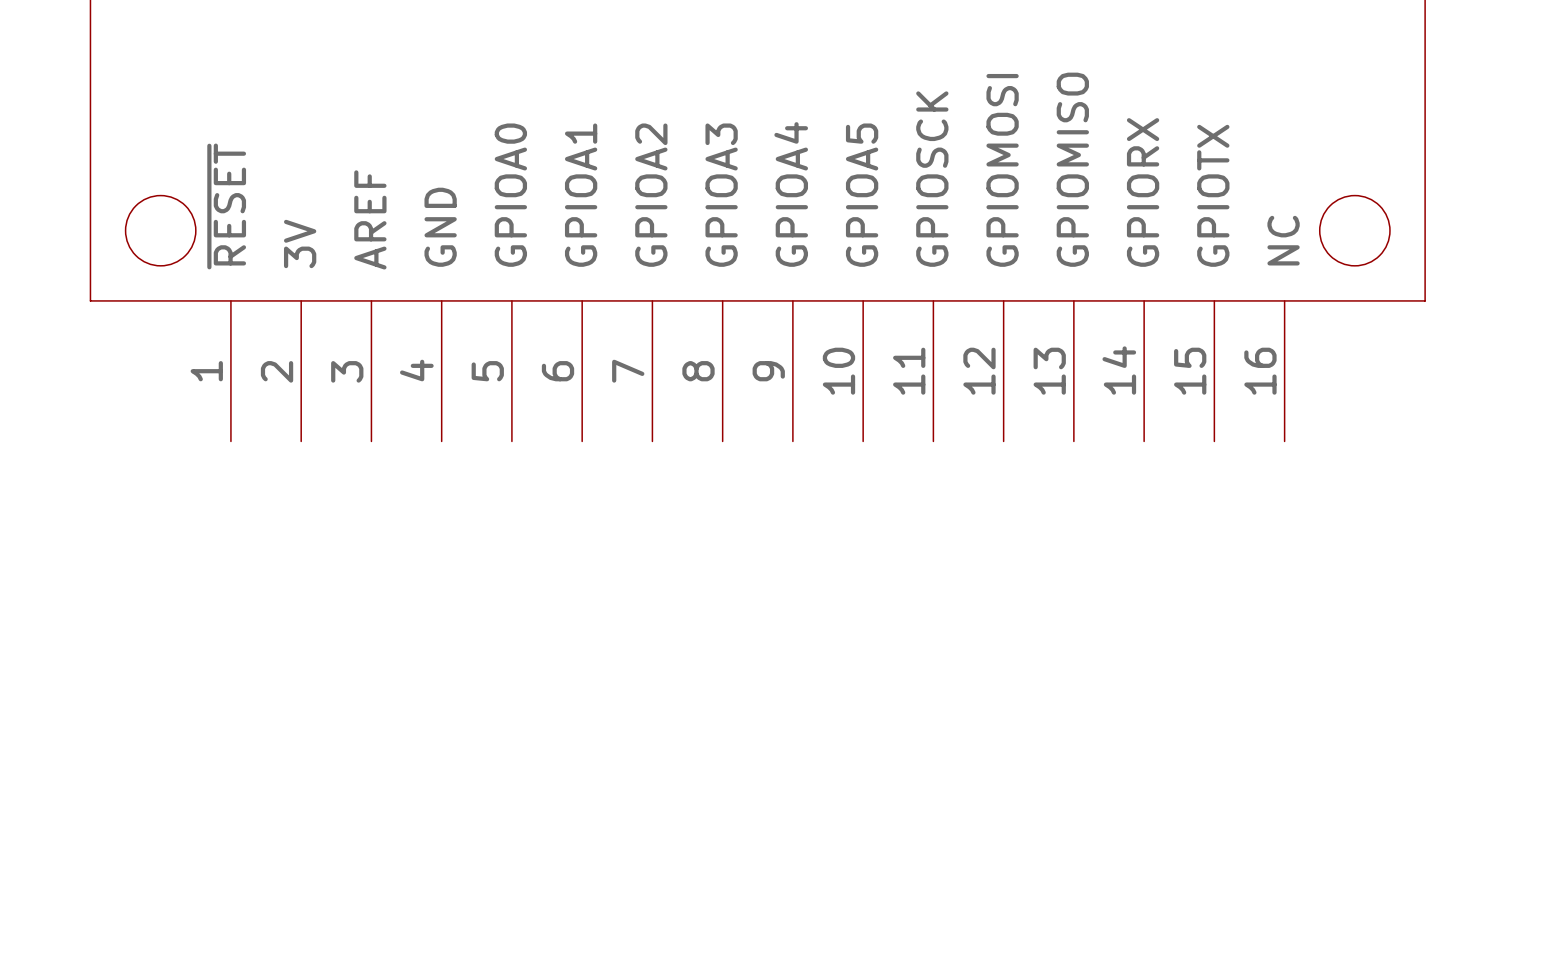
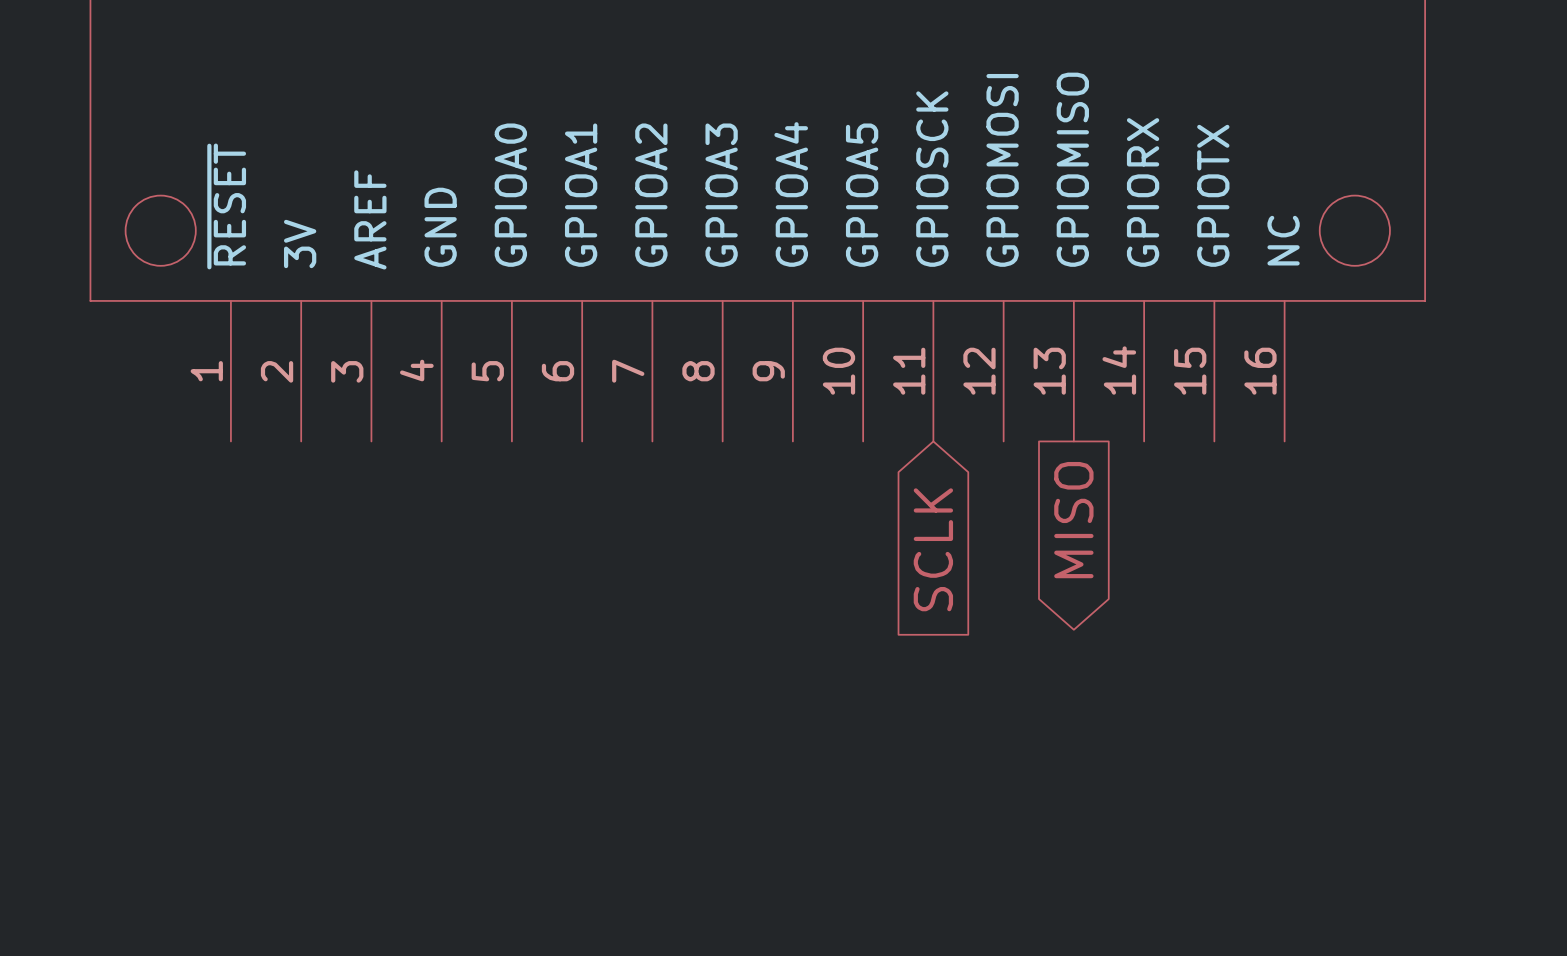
global label: none -> MISO (1073, 520)
global label: none -> SCLK (933, 549)

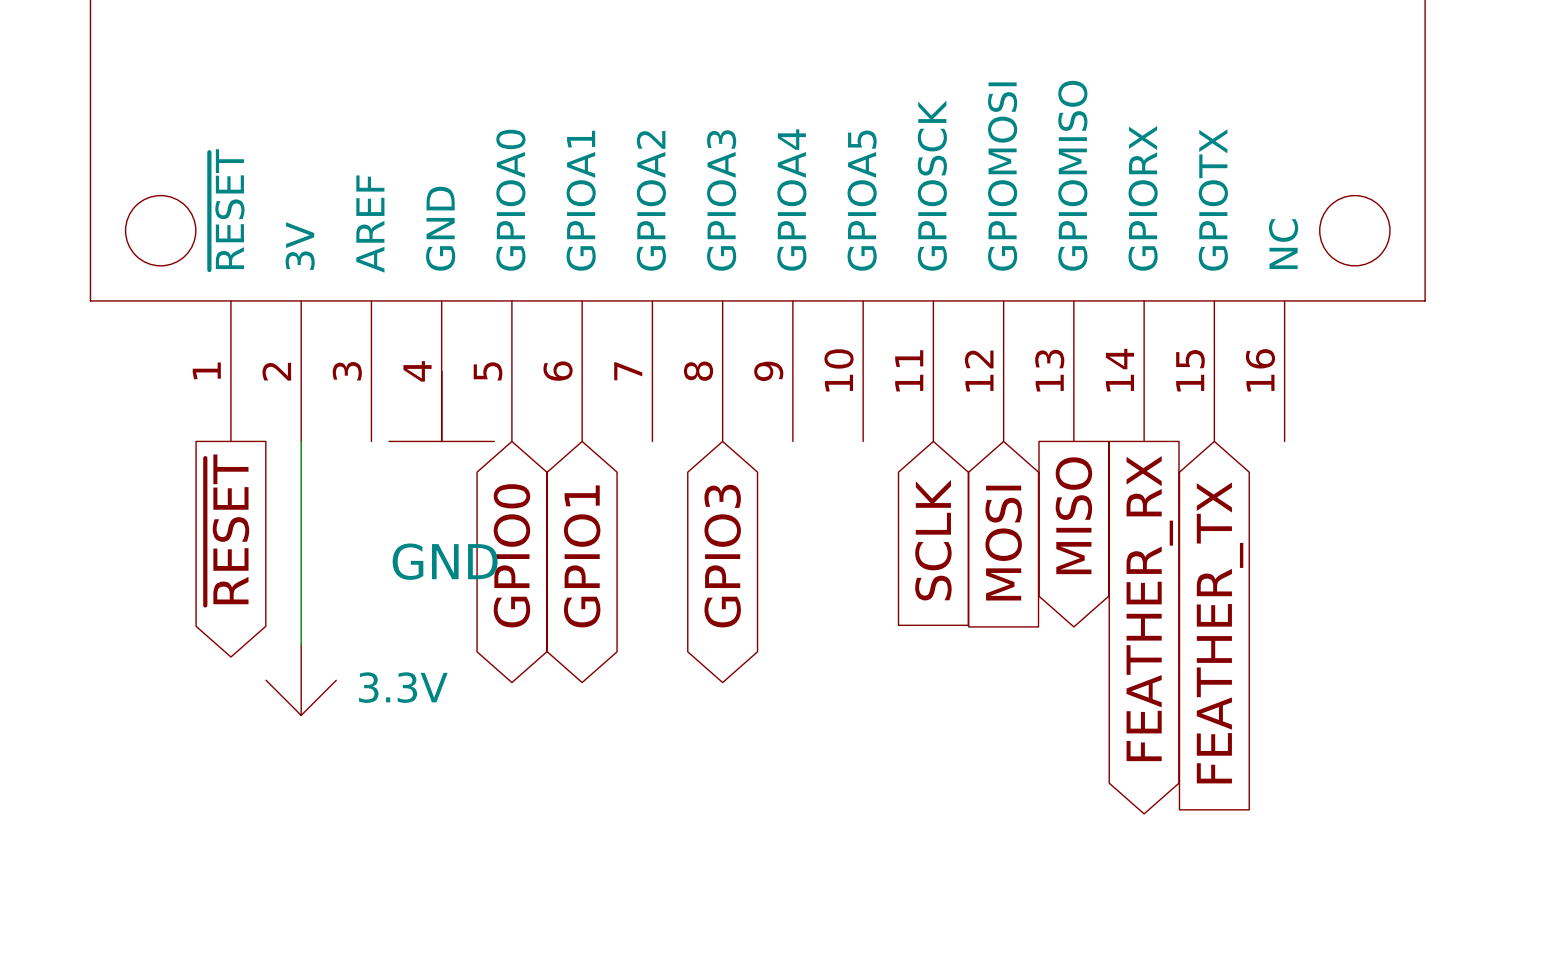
power symbol: none -> GND (441, 406)
wire: none -> (301, 441) (301, 645)
global label: none -> ~{RESET} (227, 529)
global label: none -> MOSI (1003, 543)
global label: none -> GPIO0 (511, 555)
global label: none -> GPIO1 (582, 556)
global label: none -> GPIO3 (722, 556)
global label: none -> FEATHER_RX (1149, 608)
global label: none -> FEATHER_TX (1220, 632)
power symbol: none -> 3.3V (301, 680)

